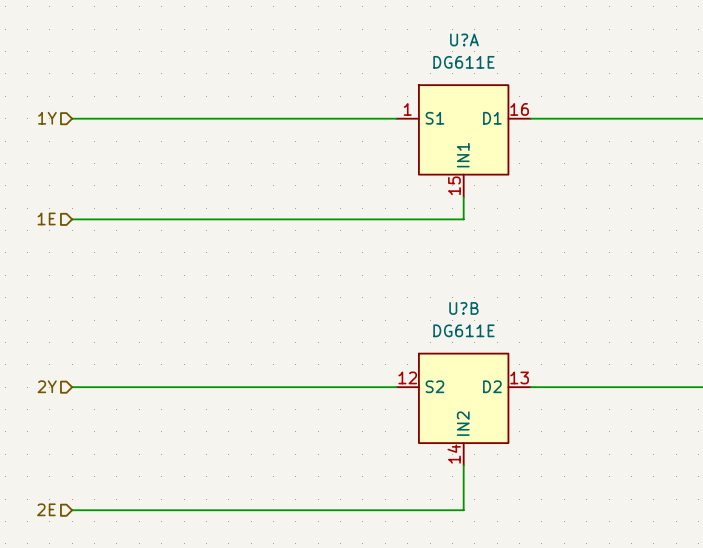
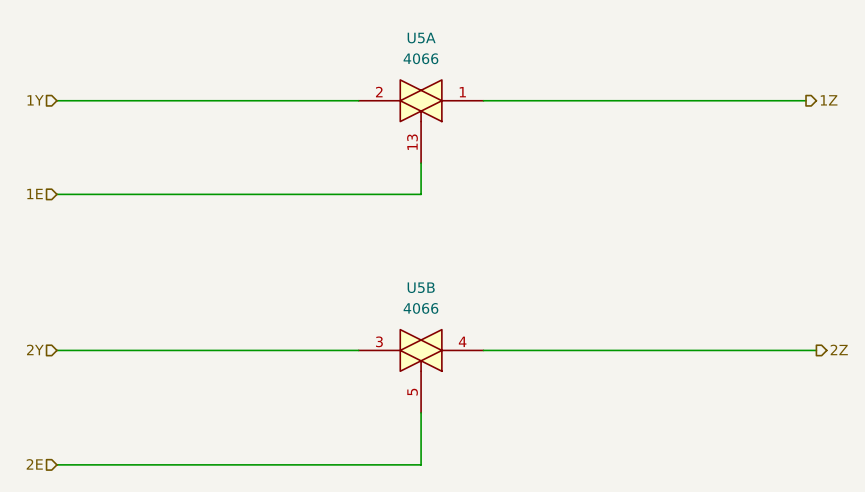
U?A: DG611E (463, 141) -> none
U5A: none -> 4066 (421, 121)
U?B: DG611E (463, 409) -> none
U5B: none -> 4066 (421, 371)

